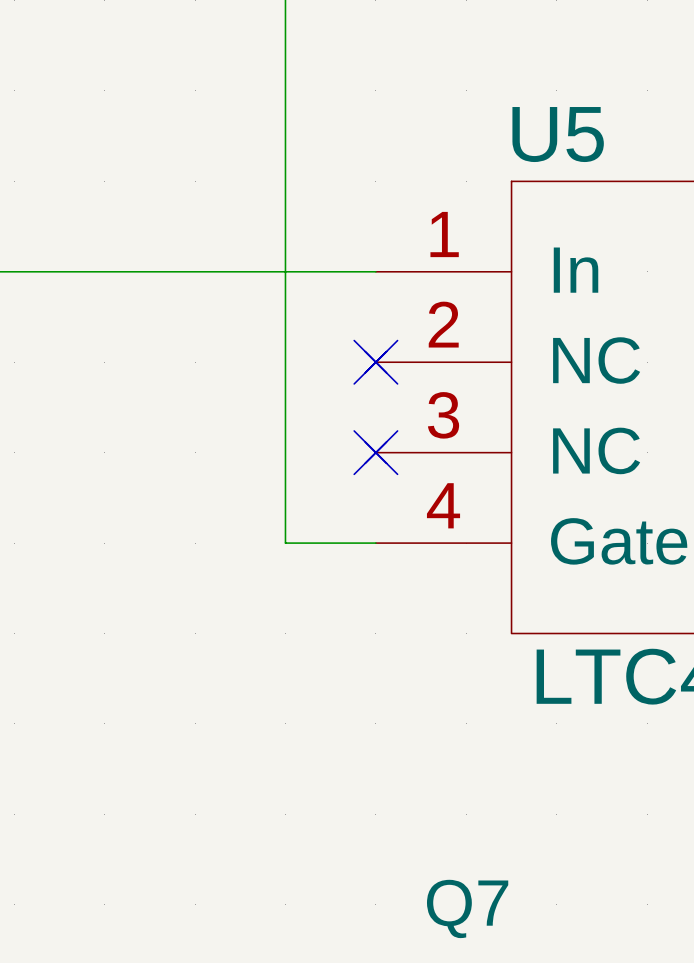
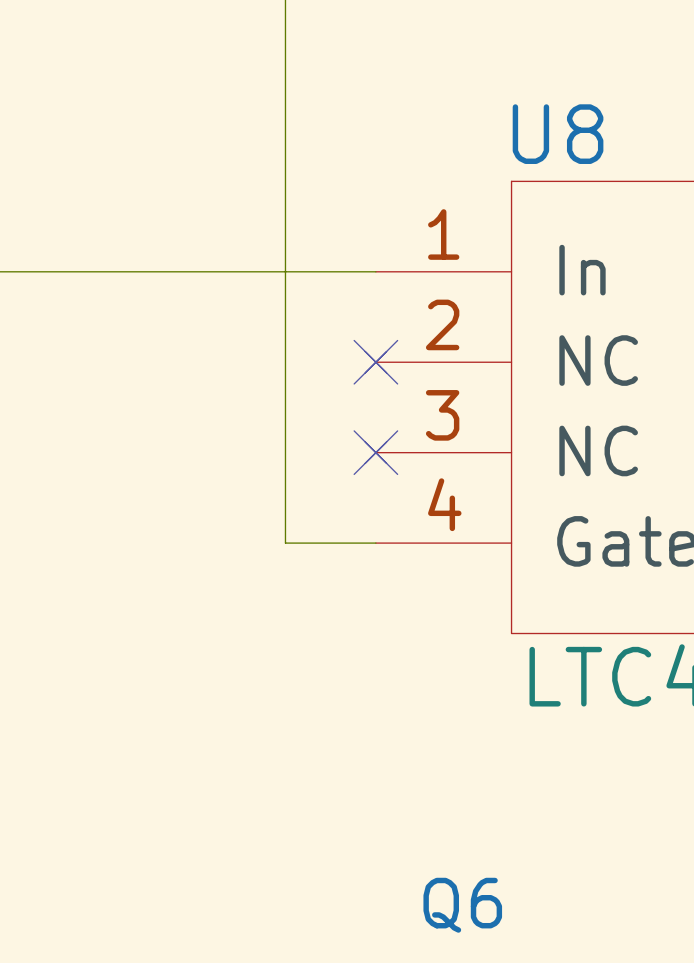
U5 name: U5 (558, 134) -> U8 (558, 134)
Q7 name: Q7 (467, 908) -> Q6 (462, 905)

